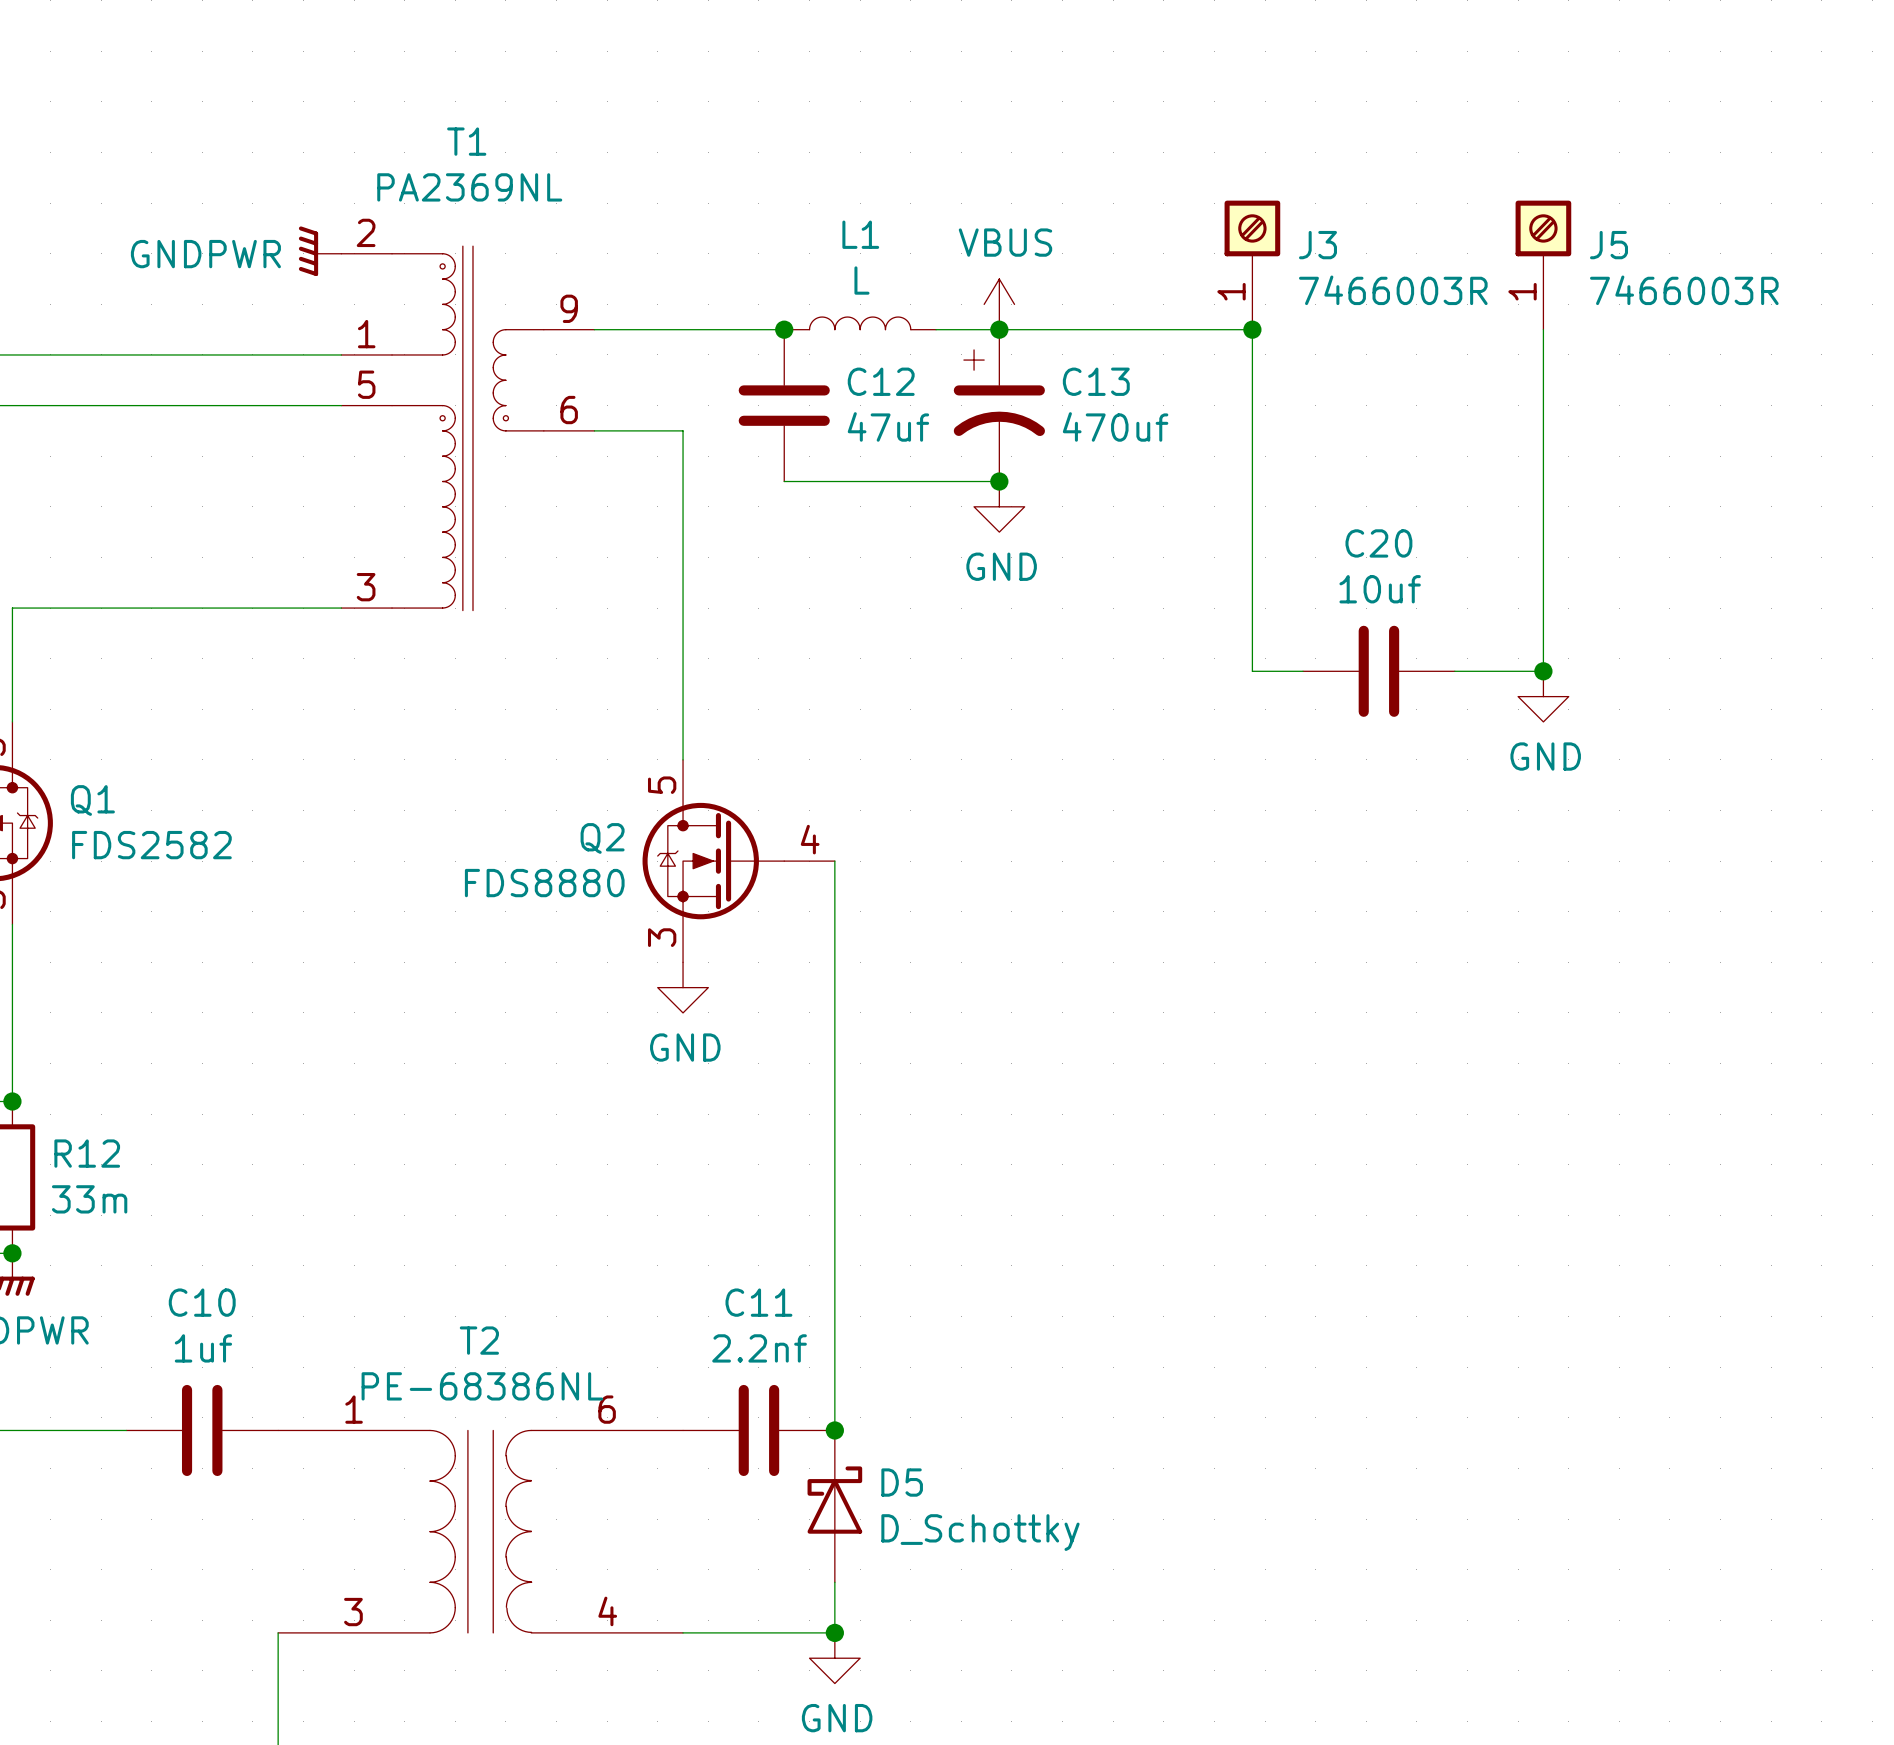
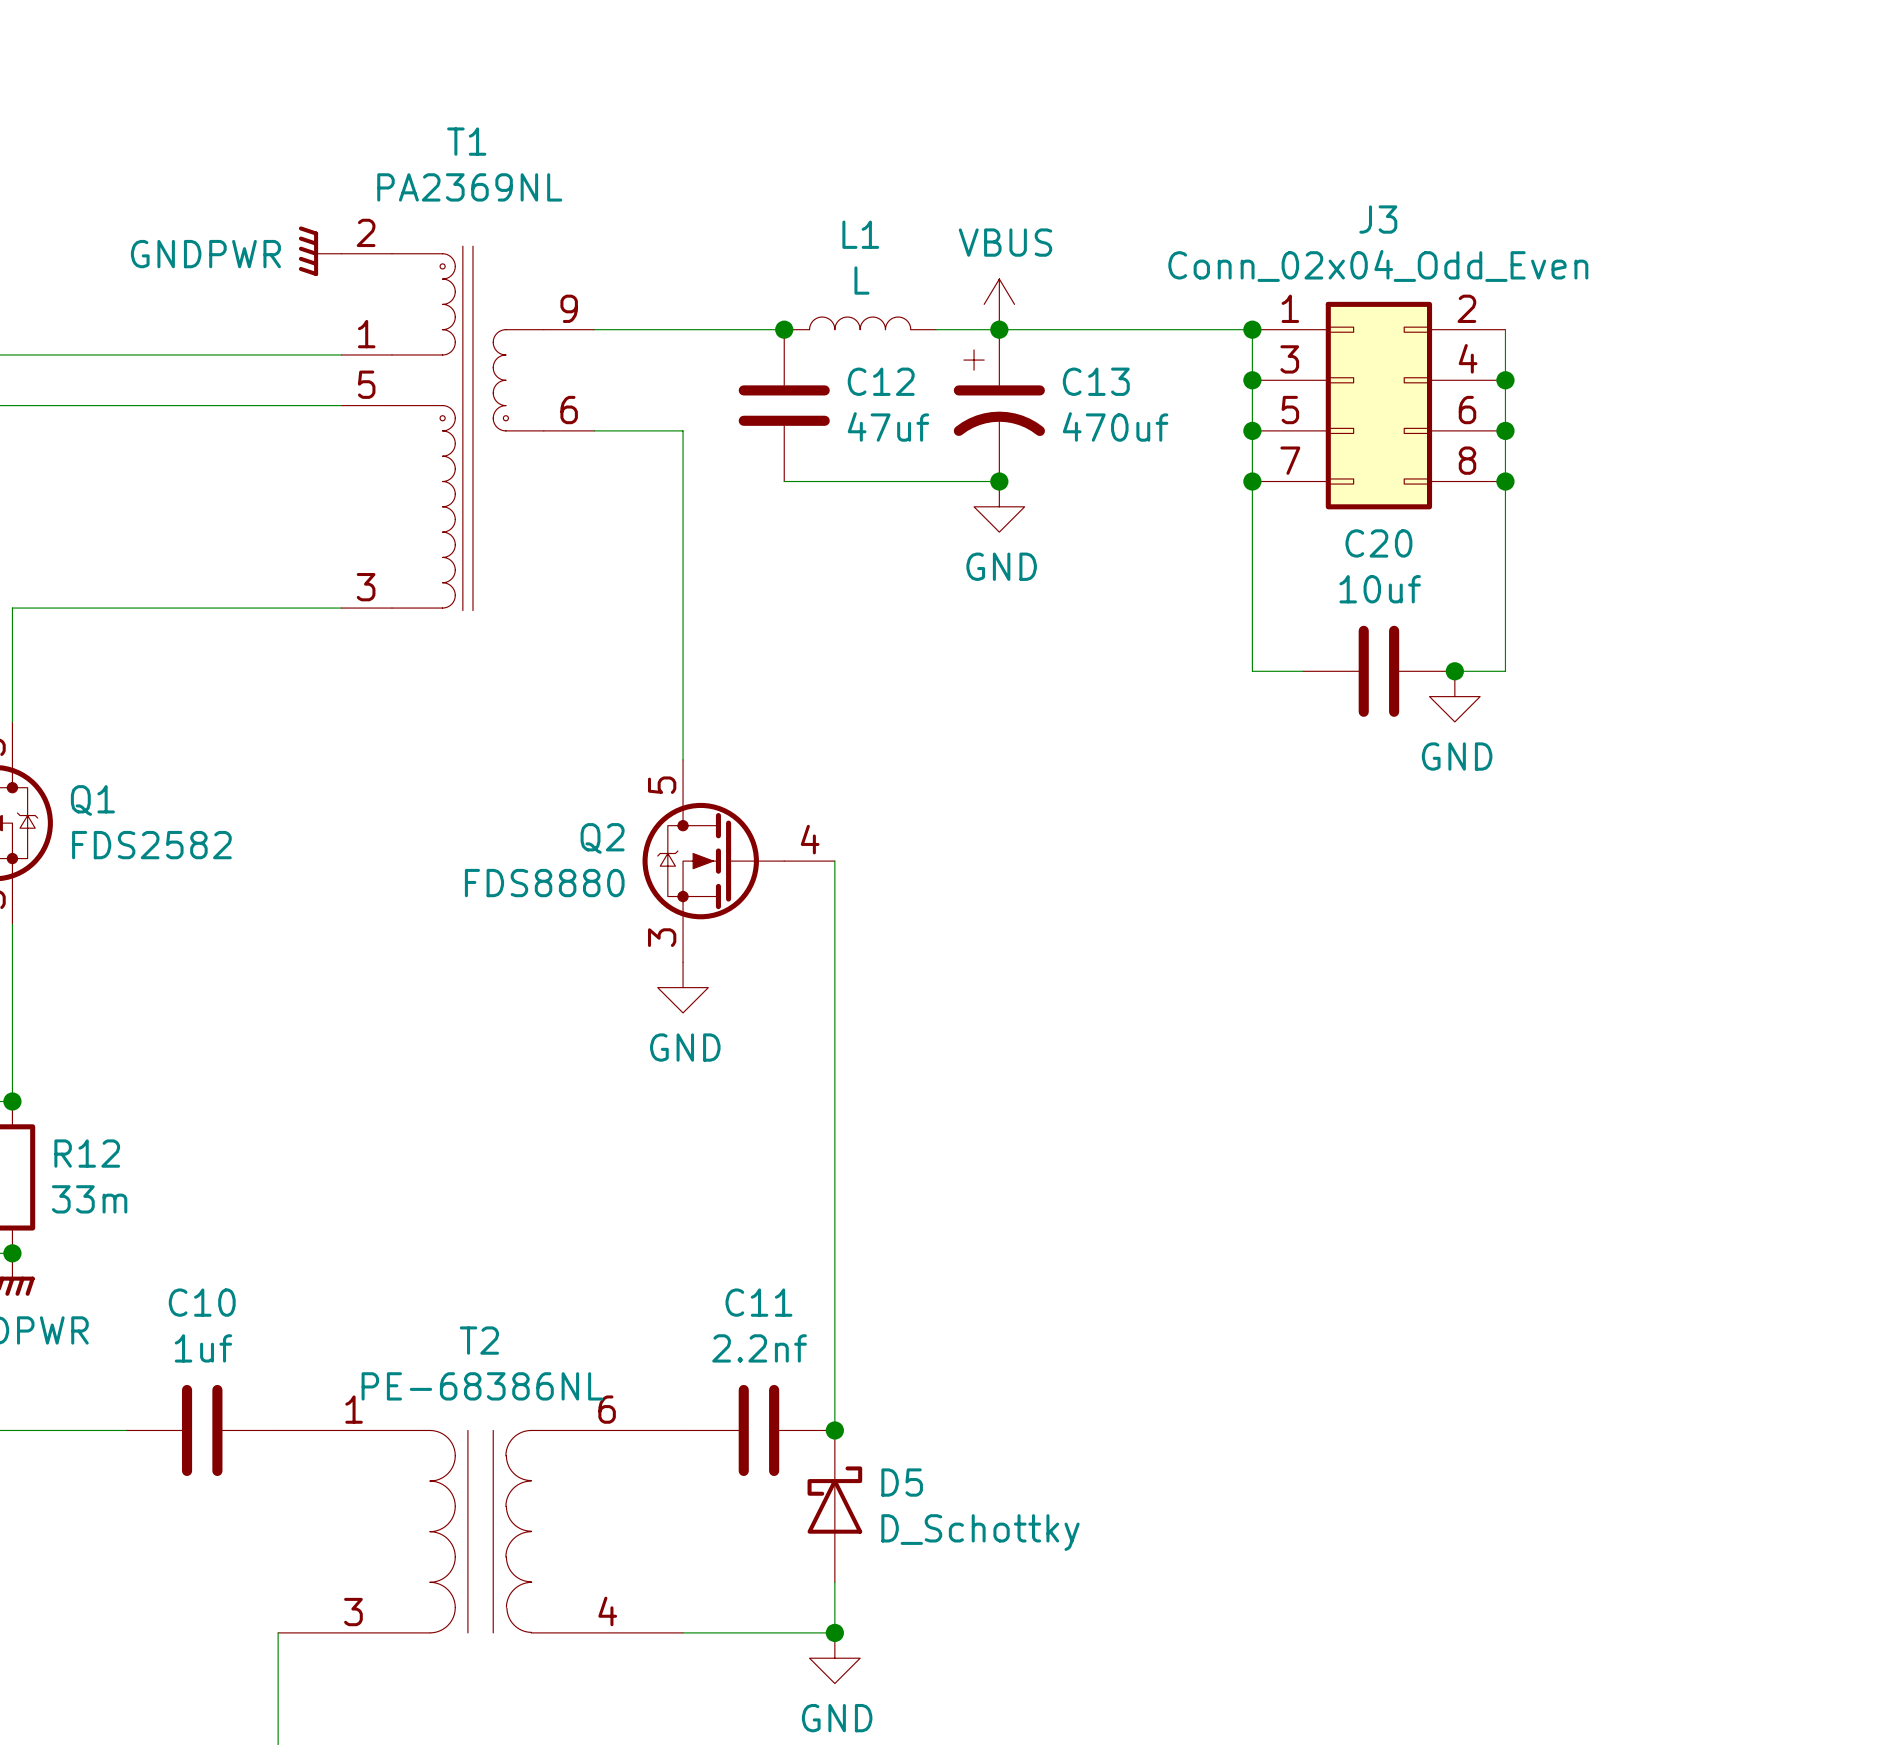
J3 symbol: [1224, 200, 1281, 330] -> [1252, 301, 1506, 510]
J3 name position: J3 (1318, 245) -> J3 (1378, 219)
J5: 7466003R (1543, 265) -> none
J3 value: 7466003R (1393, 290) -> Conn_02x04_Odd_Even (1378, 265)
wire: (1543, 329) (1543, 671) (1505, 671) -> (1505, 329) (1505, 671)
junction: none -> (1252, 380)
junction: none -> (1505, 380)
junction: none -> (1252, 430)
junction: none -> (1505, 430)
junction: none -> (1252, 481)
junction: none -> (1505, 481)
junction position: (1543, 671) -> (1454, 671)
power symbol position: GND (1543, 696) -> GND (1454, 696)

